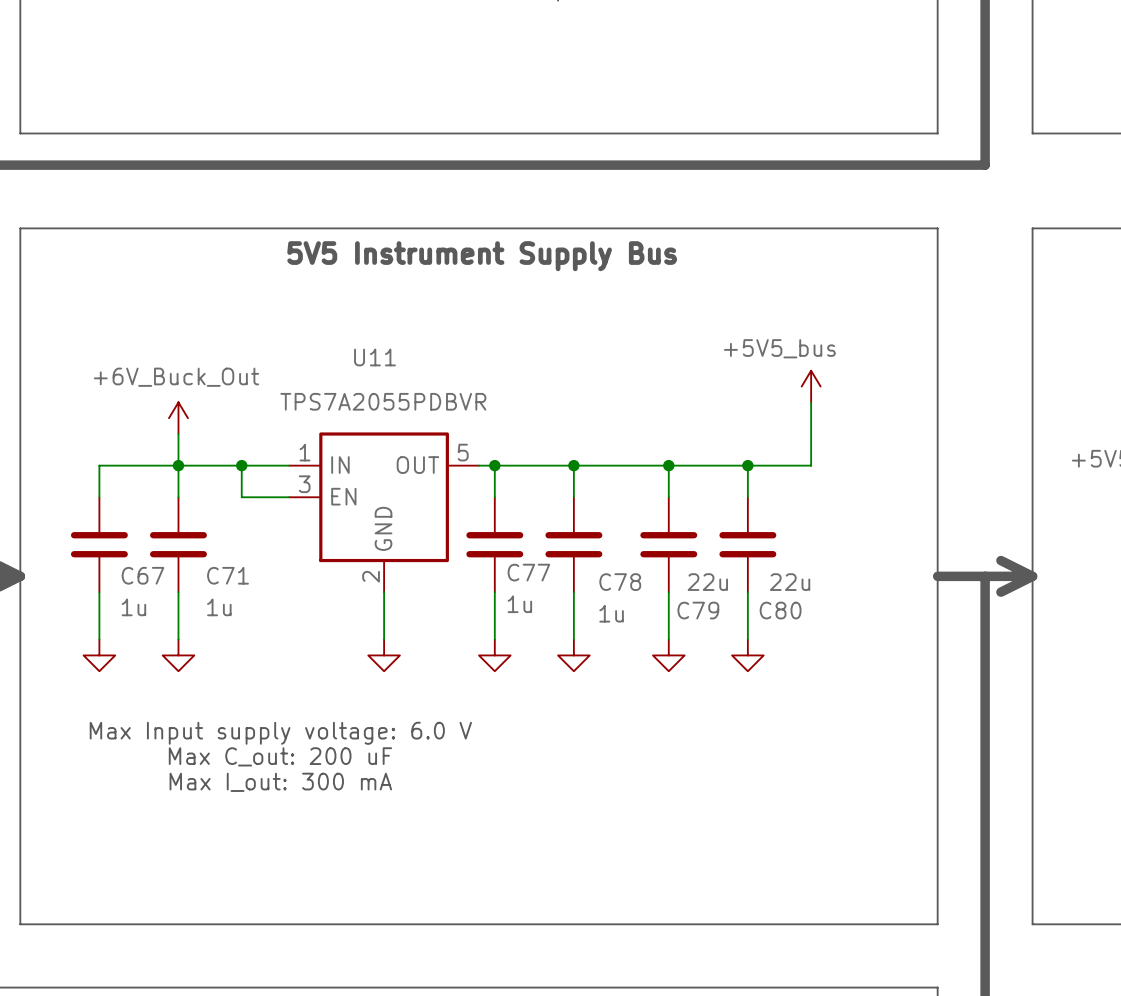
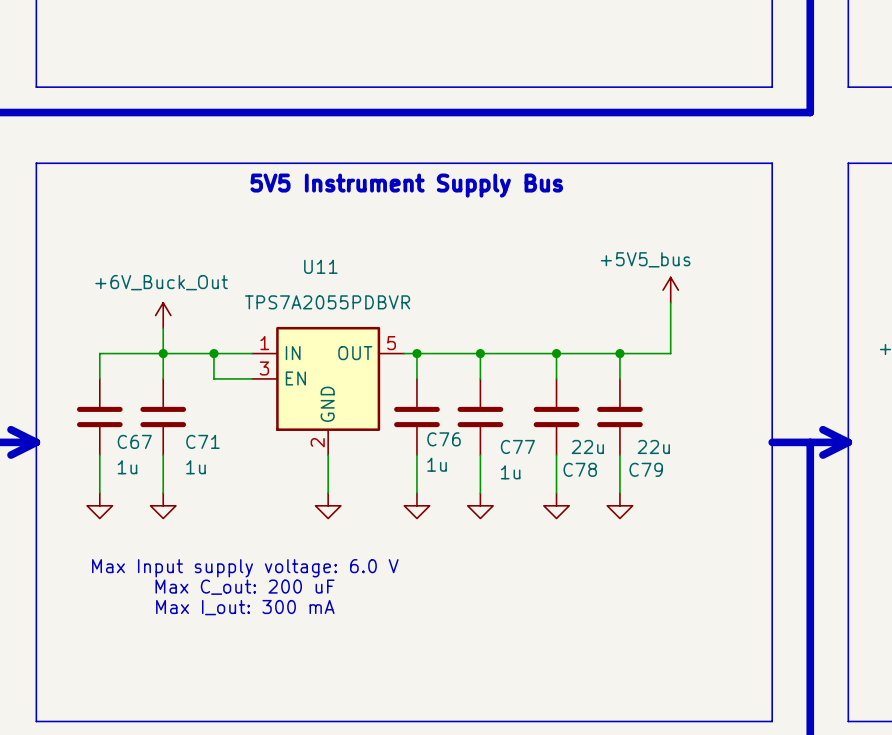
C77 name: C77 (528, 572) -> C76 (444, 439)
C78 name: C78 (620, 582) -> C77 (517, 446)
C79 name: C79 (698, 610) -> C78 (580, 469)
C80 name: C80 (780, 610) -> C79 (646, 469)

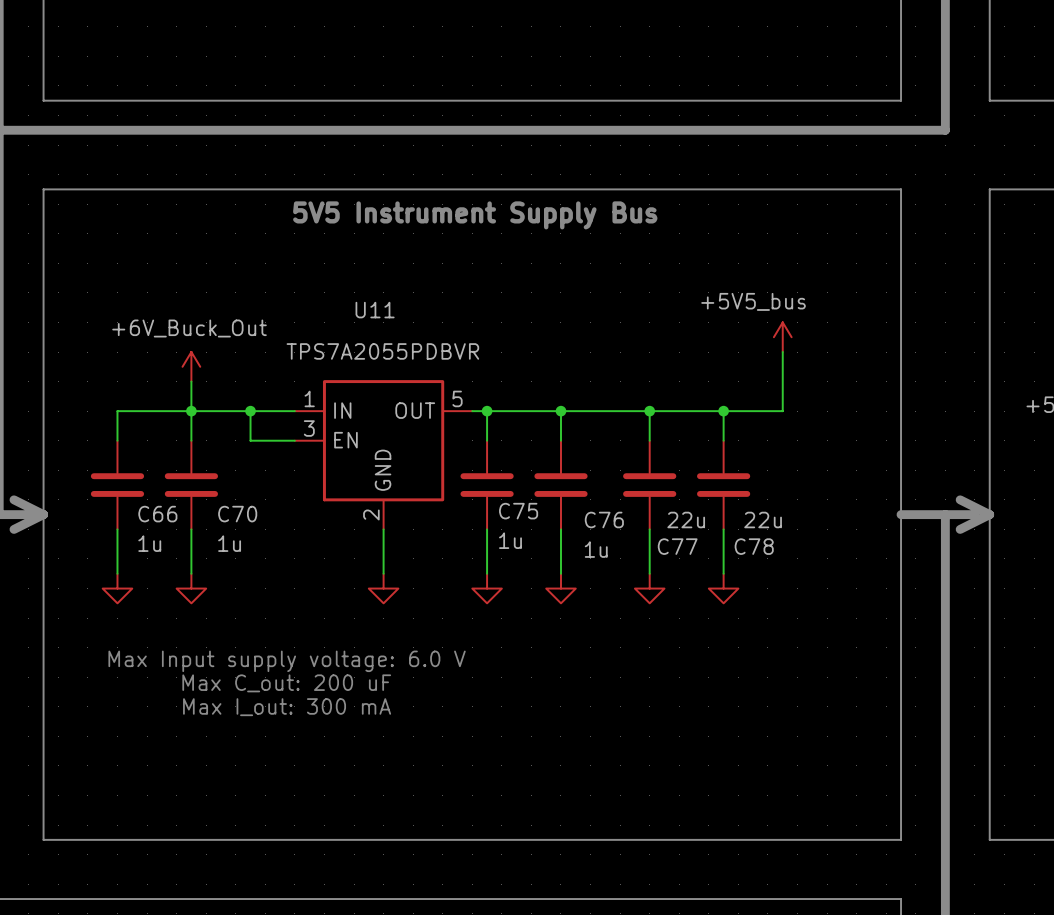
C76 name: C76 (444, 439) -> C75 (518, 511)
C67 name: C67 (134, 441) -> C66 (157, 514)
C71 name: C71 (202, 441) -> C70 (237, 514)
C77 name: C77 (517, 446) -> C76 (604, 519)
C78 name: C78 (580, 469) -> C77 (677, 546)
C79 name: C79 (646, 469) -> C78 (754, 546)

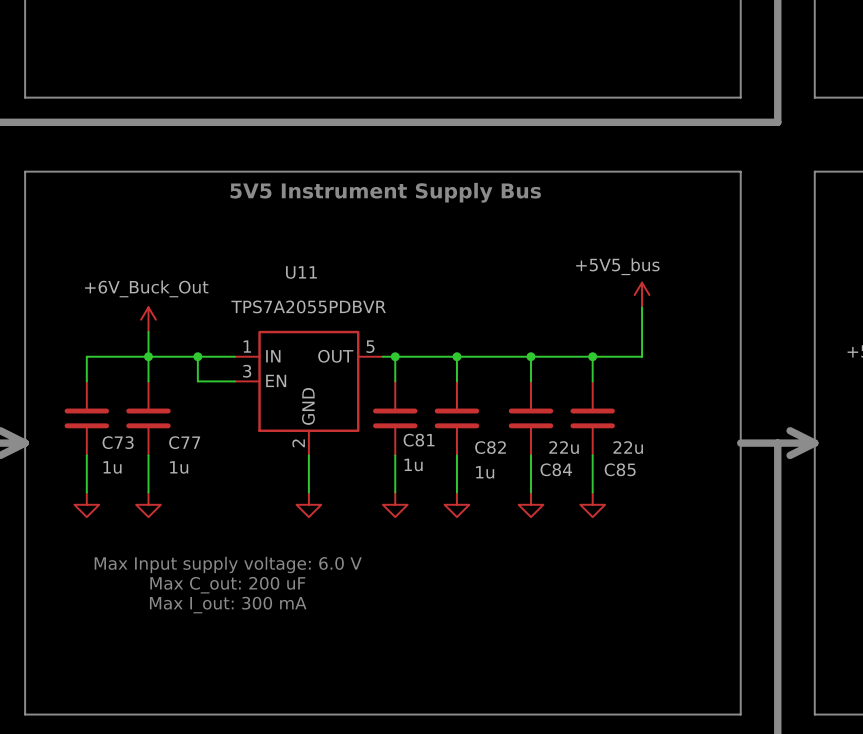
C75 name: C75 (518, 511) -> C81 (419, 440)
C66 name: C66 (157, 514) -> C73 (118, 442)
C70 name: C70 (237, 514) -> C77 (184, 442)
C76 name: C76 (604, 519) -> C82 (490, 447)
C77 name: C77 (677, 546) -> C84 (556, 469)
C78 name: C78 (754, 546) -> C85 (620, 469)

